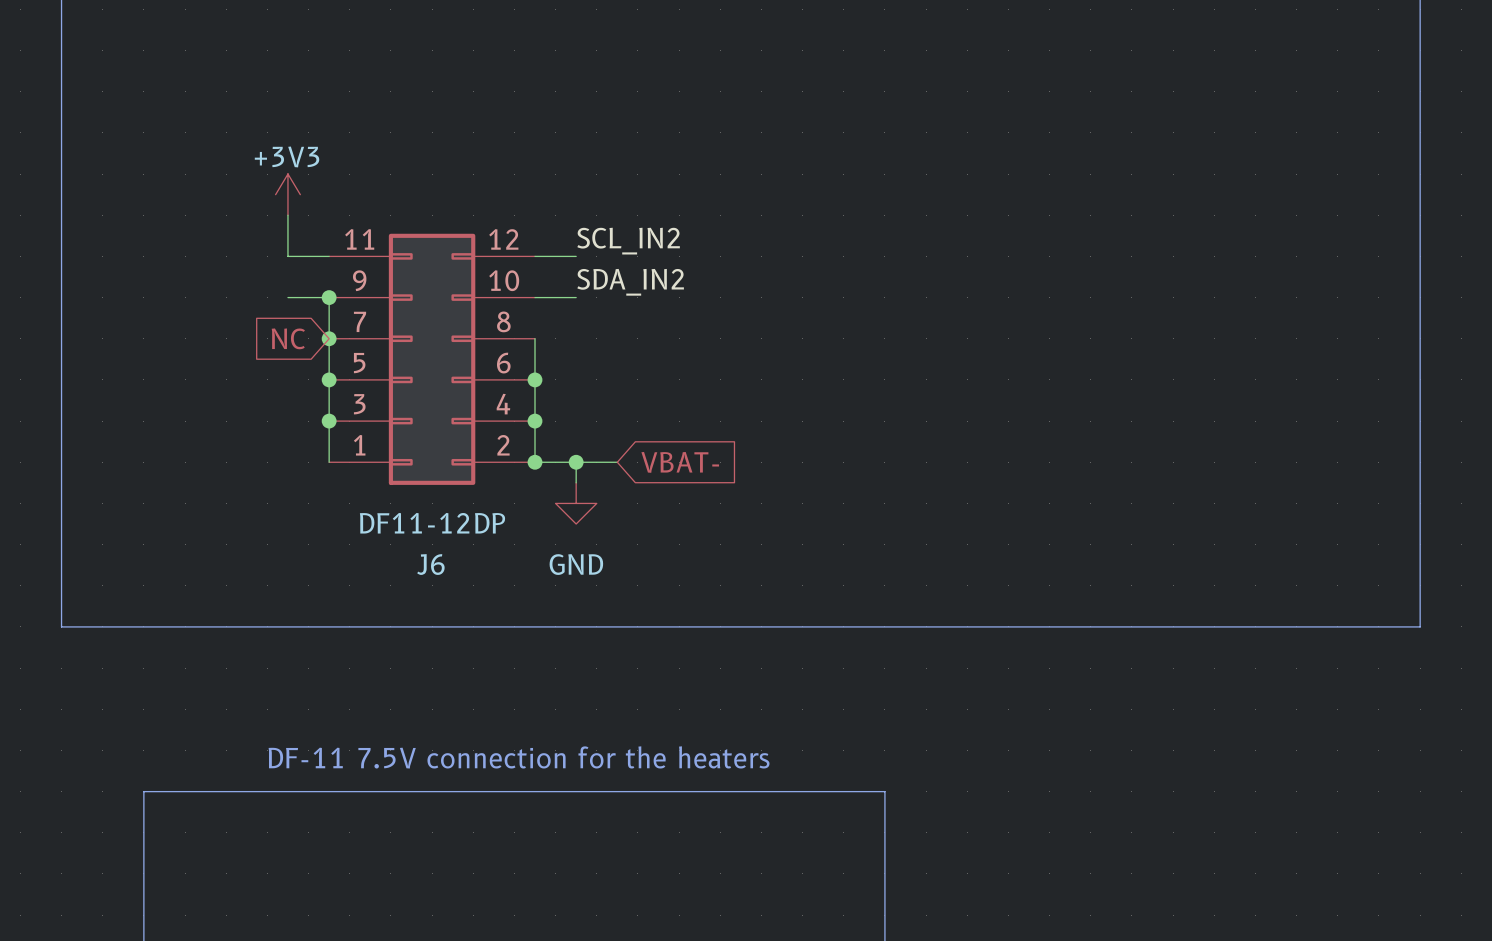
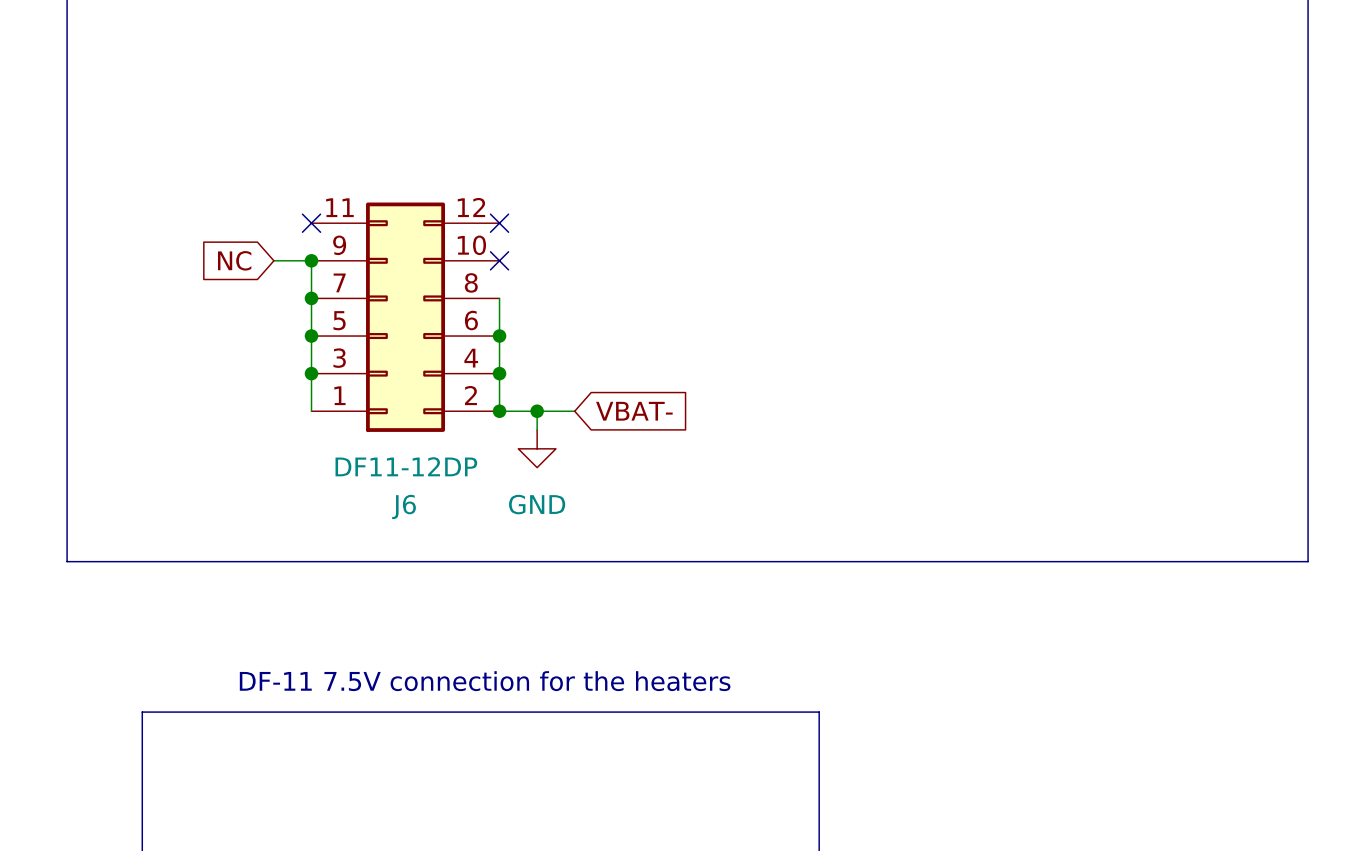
power symbol: +3V3 (287, 194) -> none
wire: (287, 215) (287, 256) (329, 256) -> none
label: SCL_IN2 (628, 241) -> none
no-connect mark: none -> (311, 223)
wire: (535, 256) (576, 256) -> none
no-connect mark: none -> (499, 223)
label: SDA_IN2 (630, 282) -> none
wire: (535, 297) (576, 297) -> none
no-connect mark: none -> (499, 260)
global label position: NC (288, 338) -> NC (234, 260)

